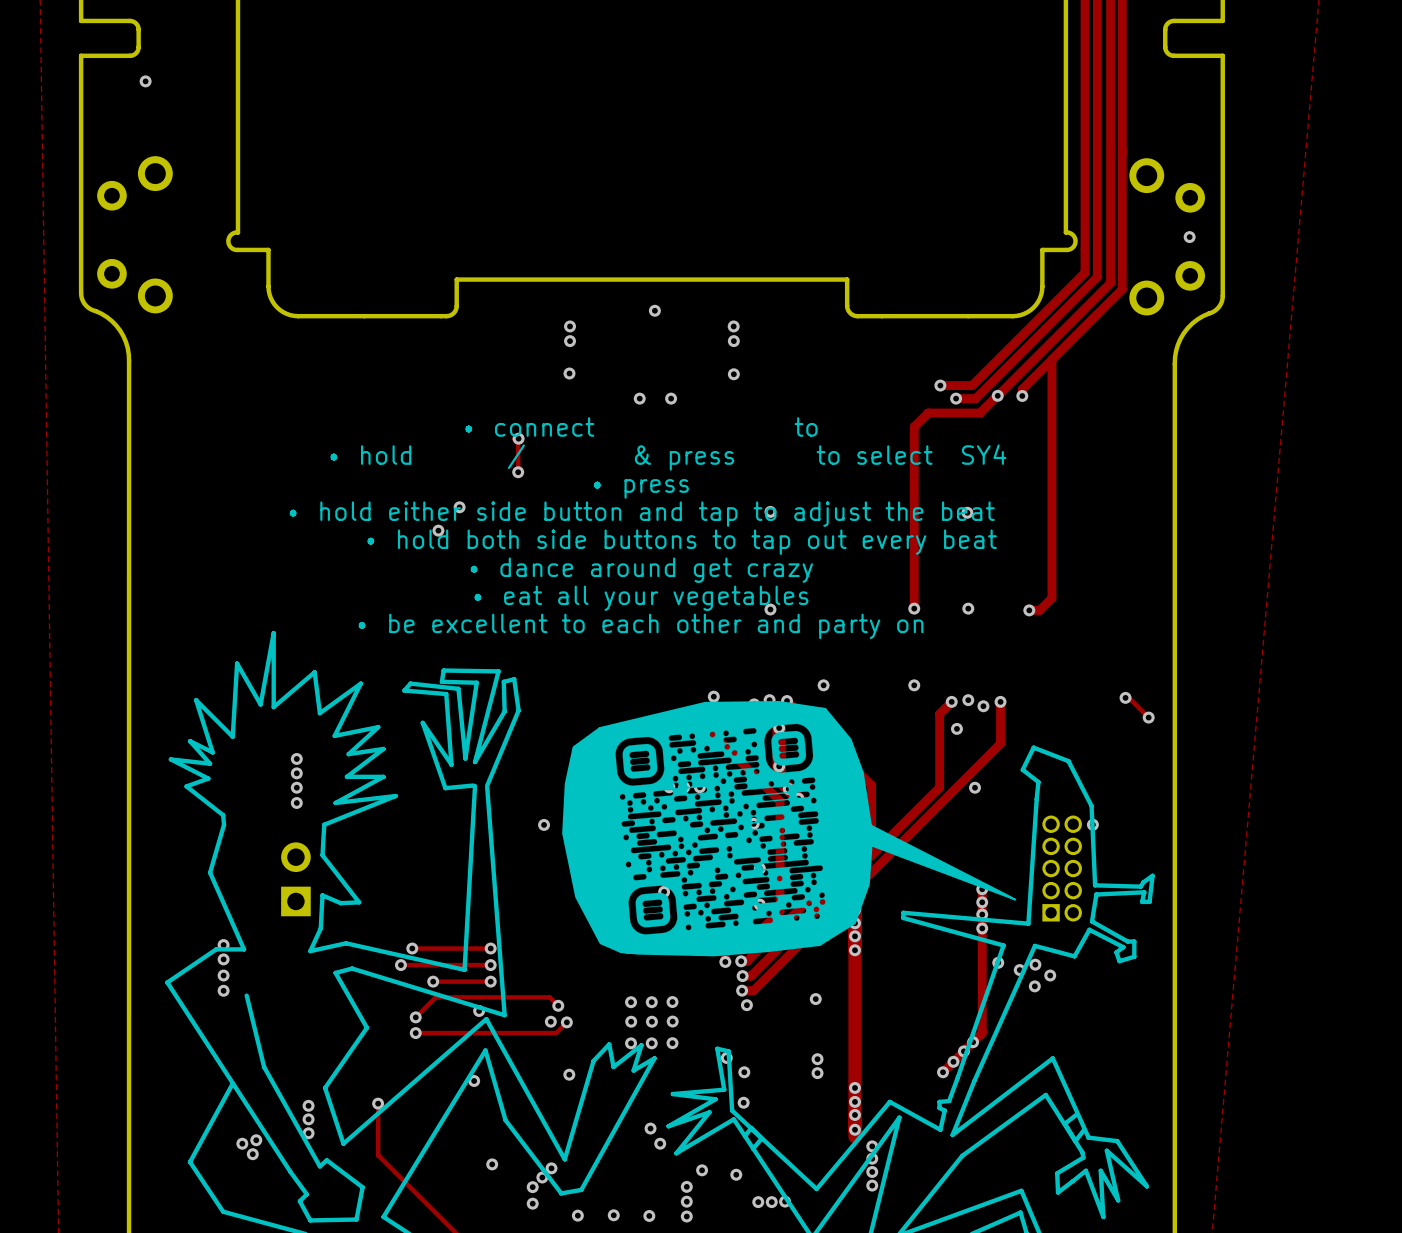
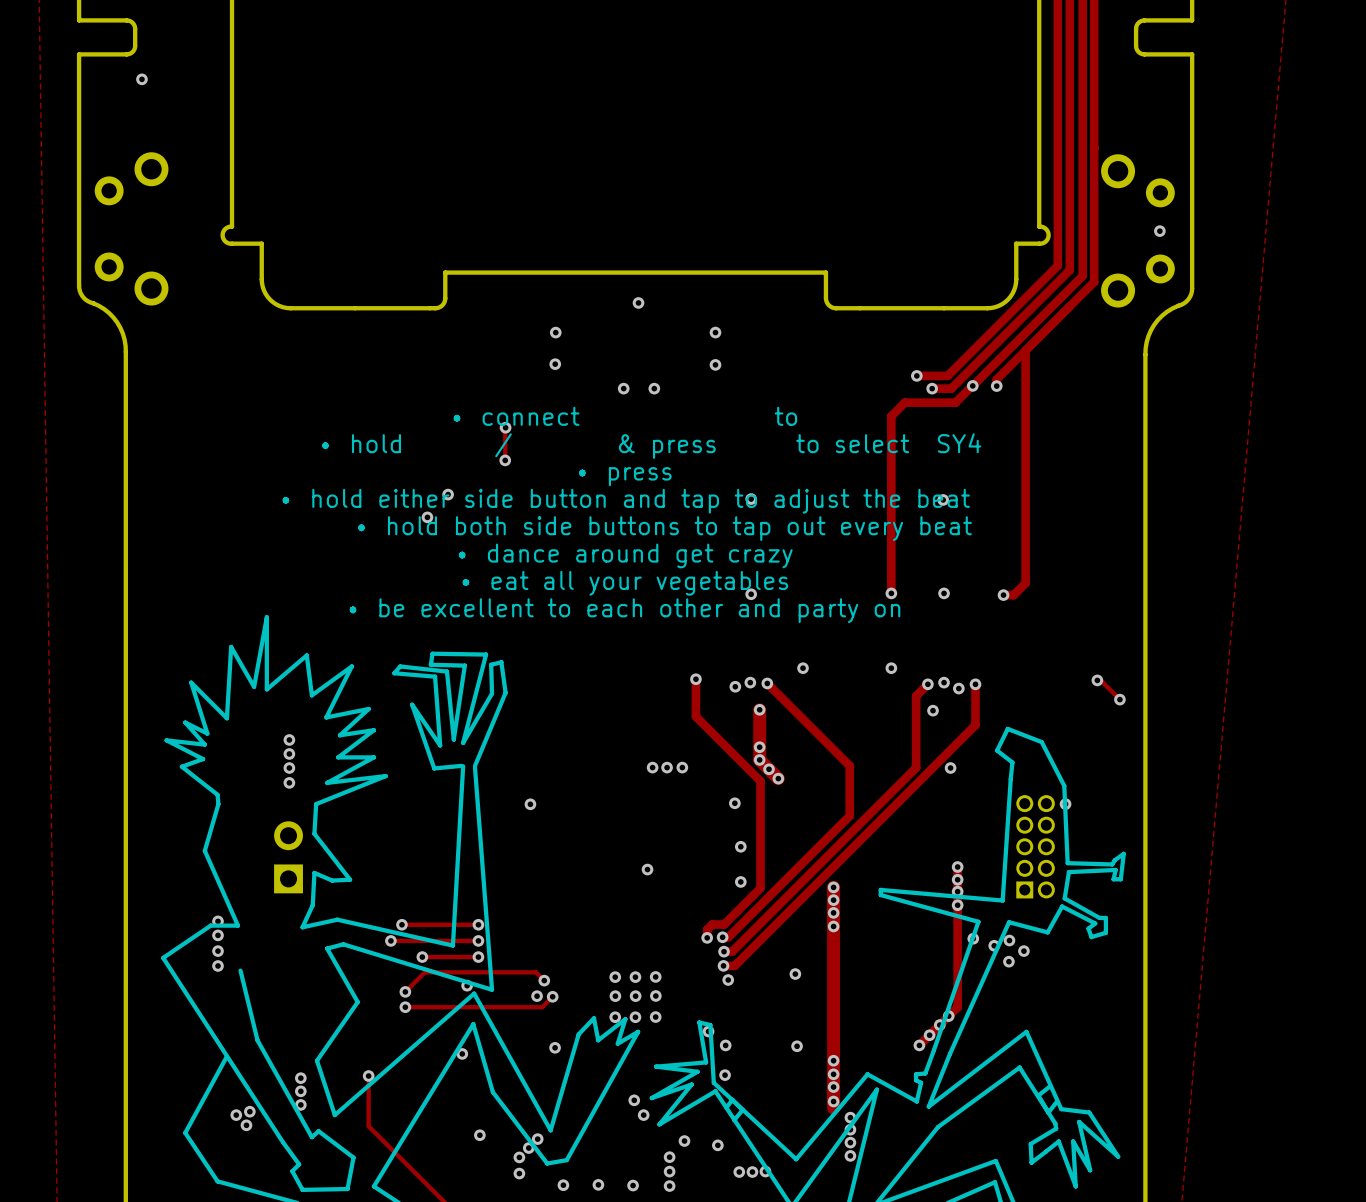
via: (570, 326) -> none
via: (733, 326) -> none
drawing: [562, 701, 1017, 957] -> none
via: (817, 1059) -> none

